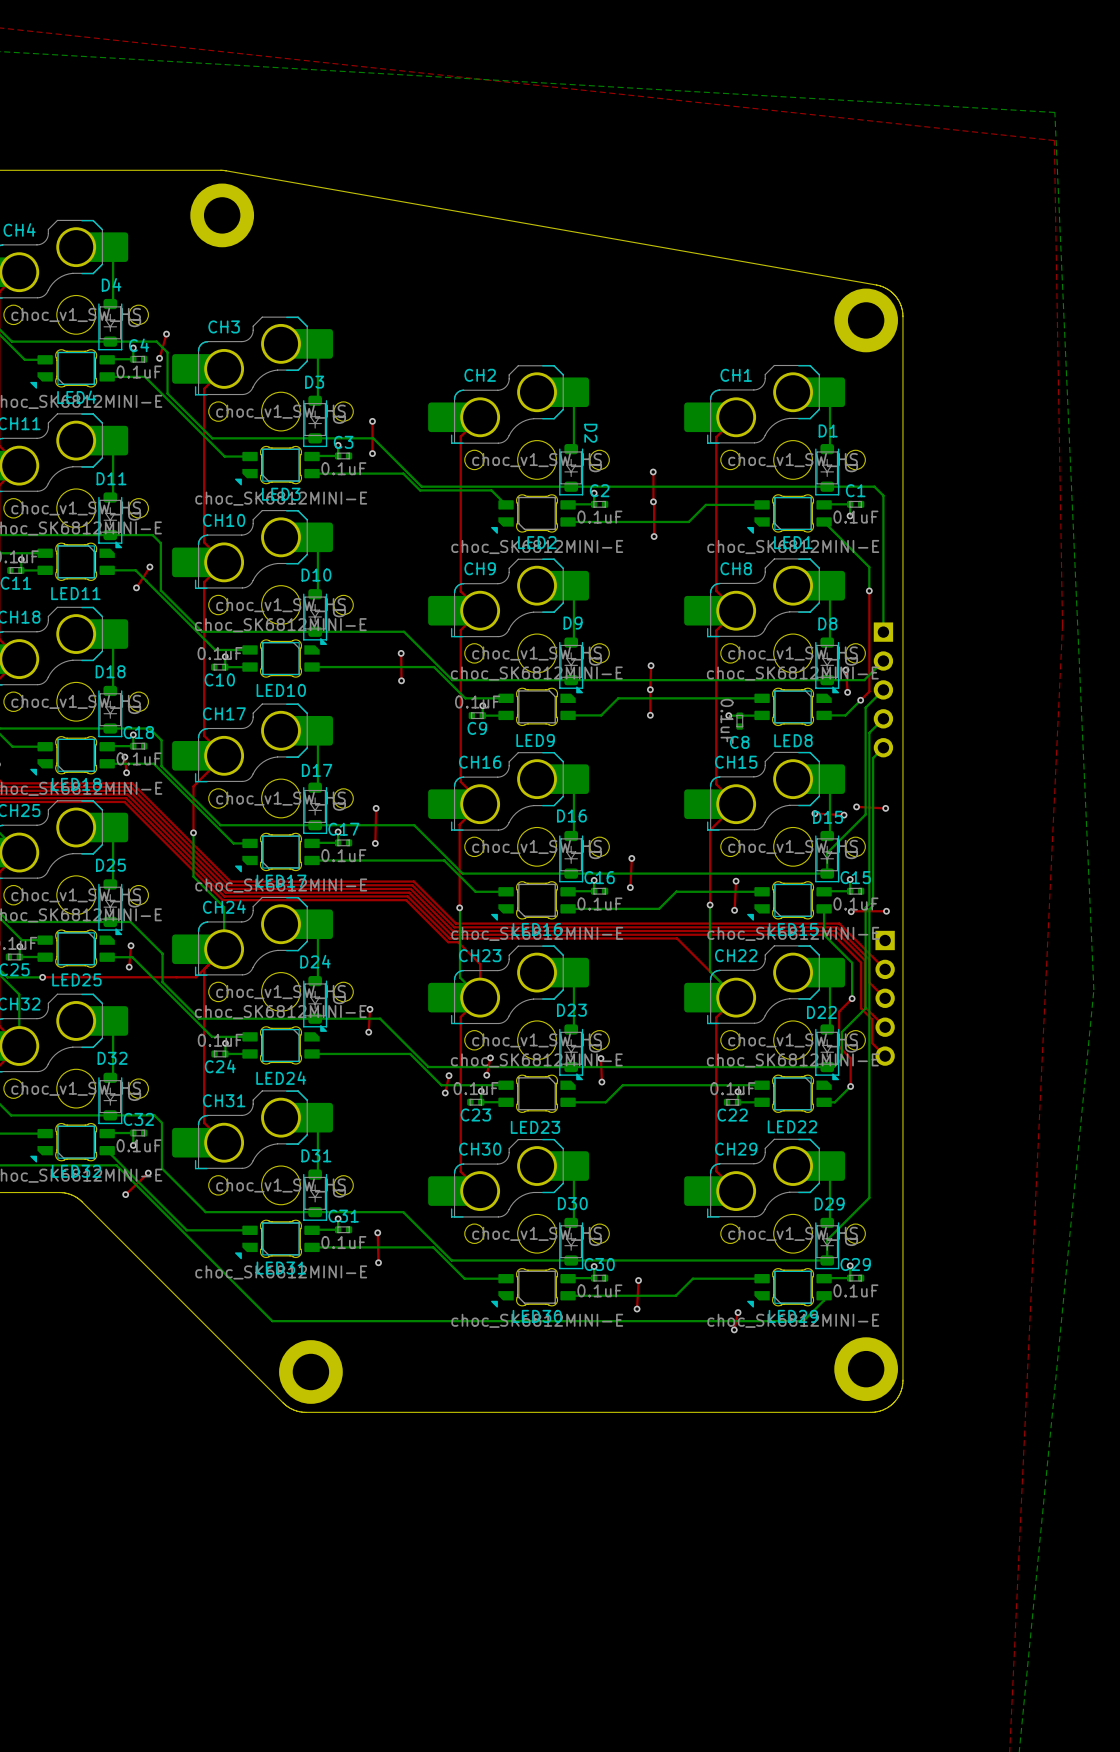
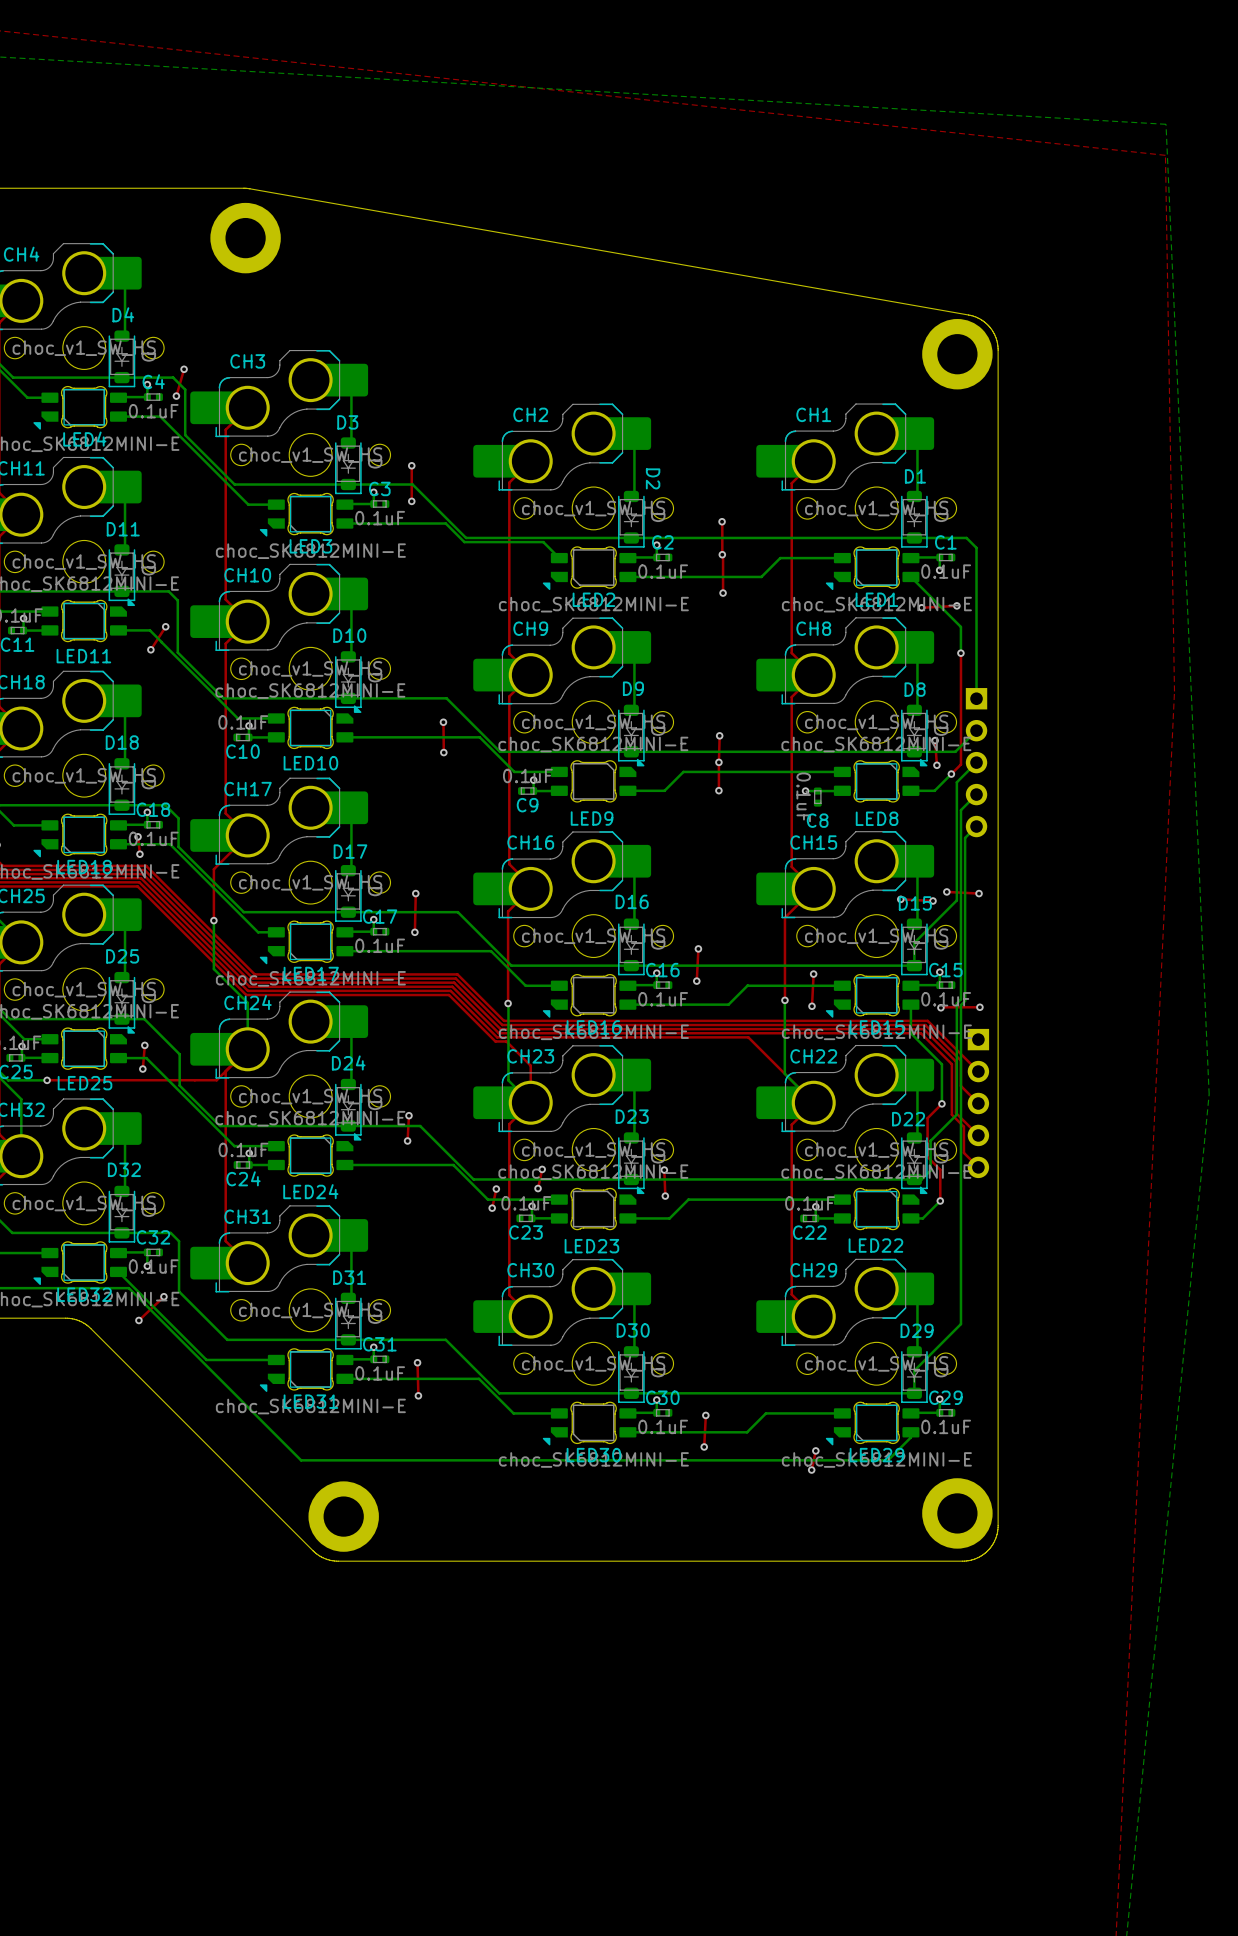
top track: none -> (956, 605) (921, 607)
via: none -> (956, 605)
via: none -> (921, 607)

